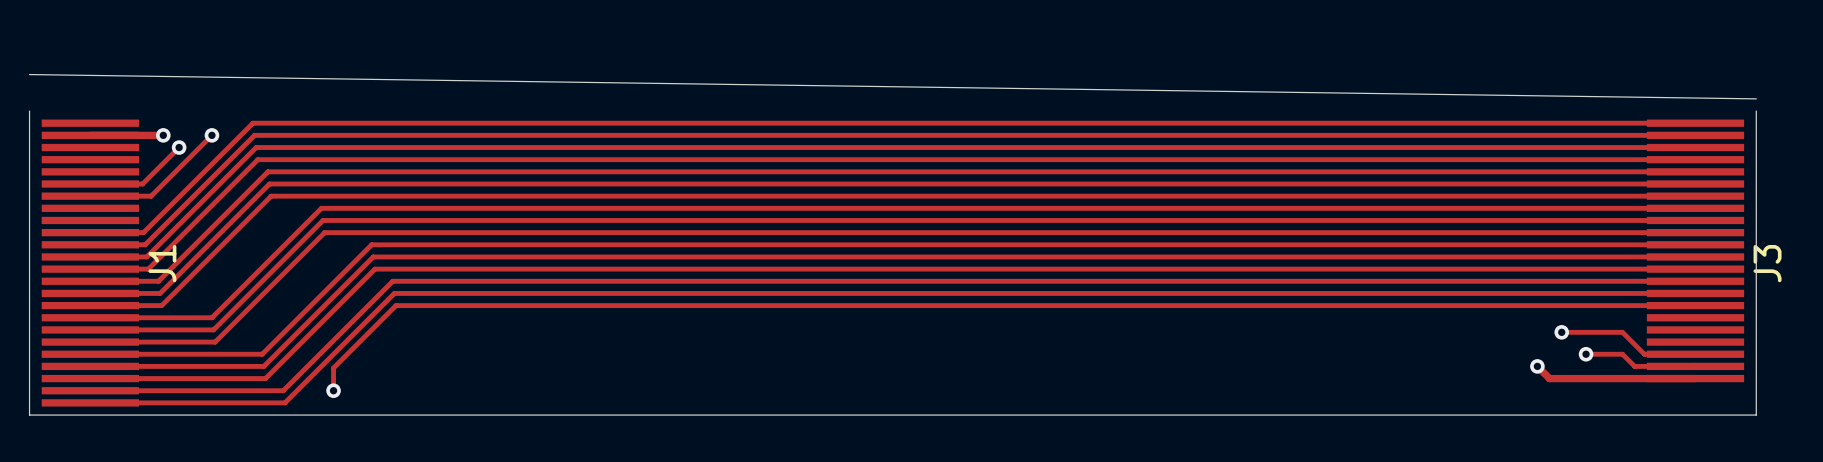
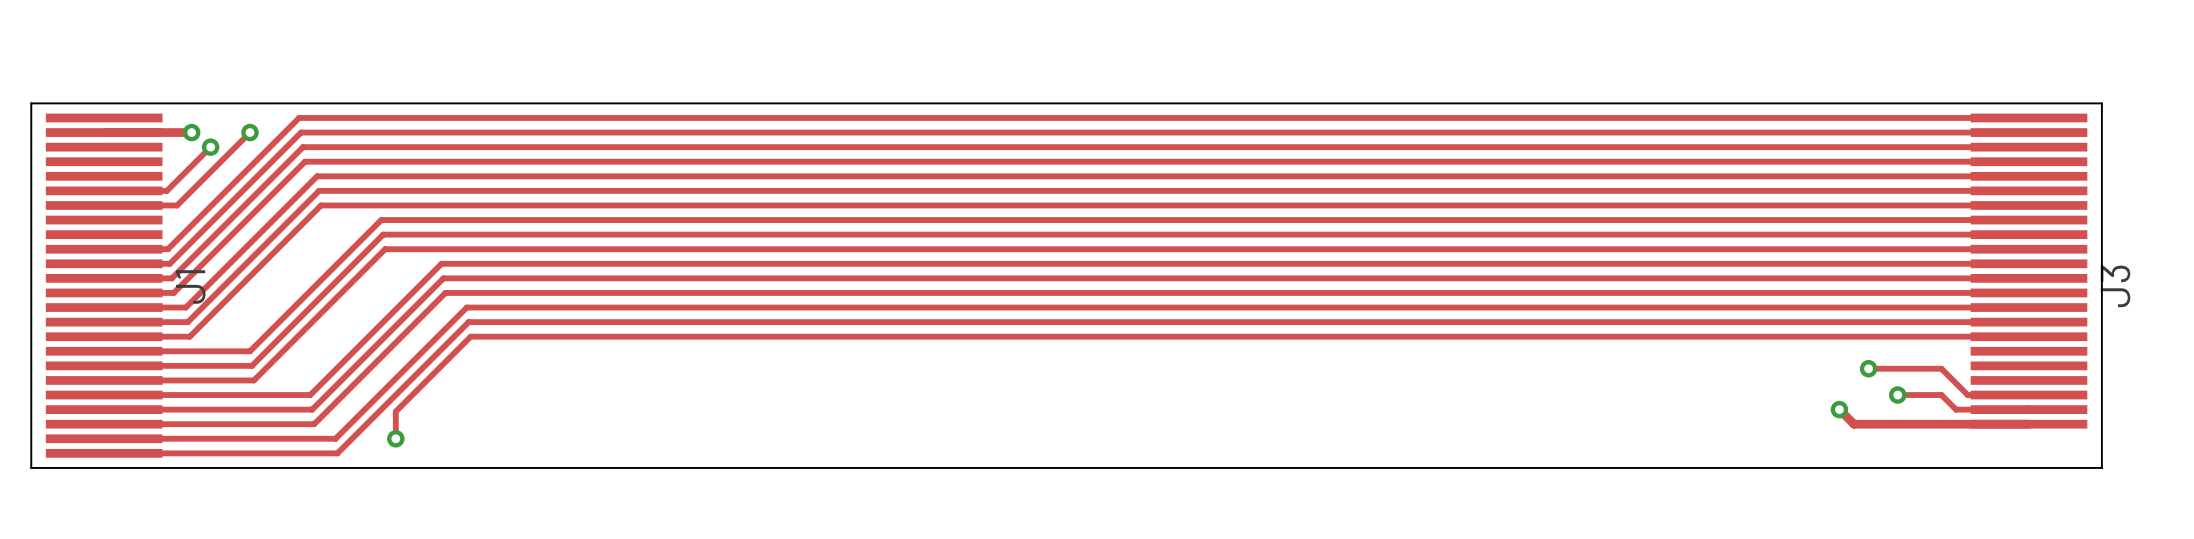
board edge: (29, 74) (1756, 98) -> none
board edge: none -> (31, 103) (2101, 103)

